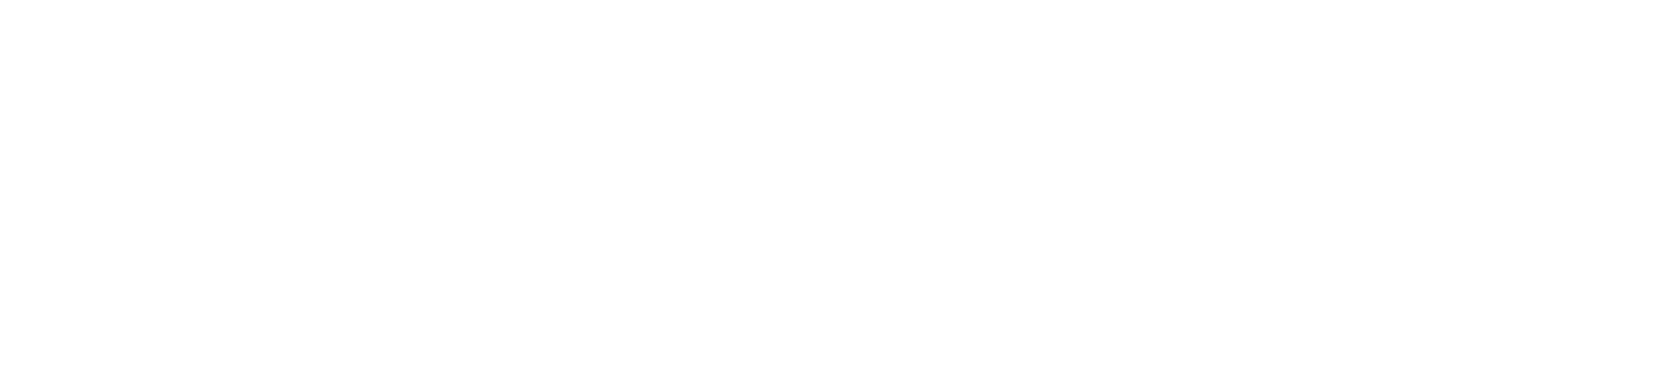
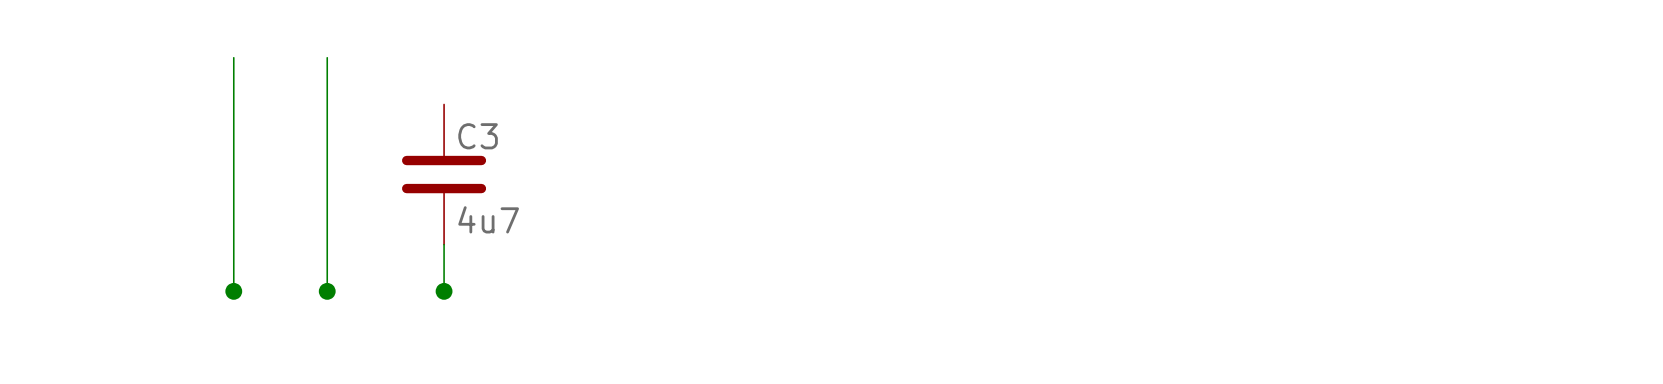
wire: none -> (233, 57) (233, 291)
wire: none -> (327, 57) (327, 291)
C3: none -> 4u7 (444, 174)
wire: none -> (444, 244) (444, 291)
junction: none -> (233, 291)
junction: none -> (327, 291)
junction: none -> (444, 291)

